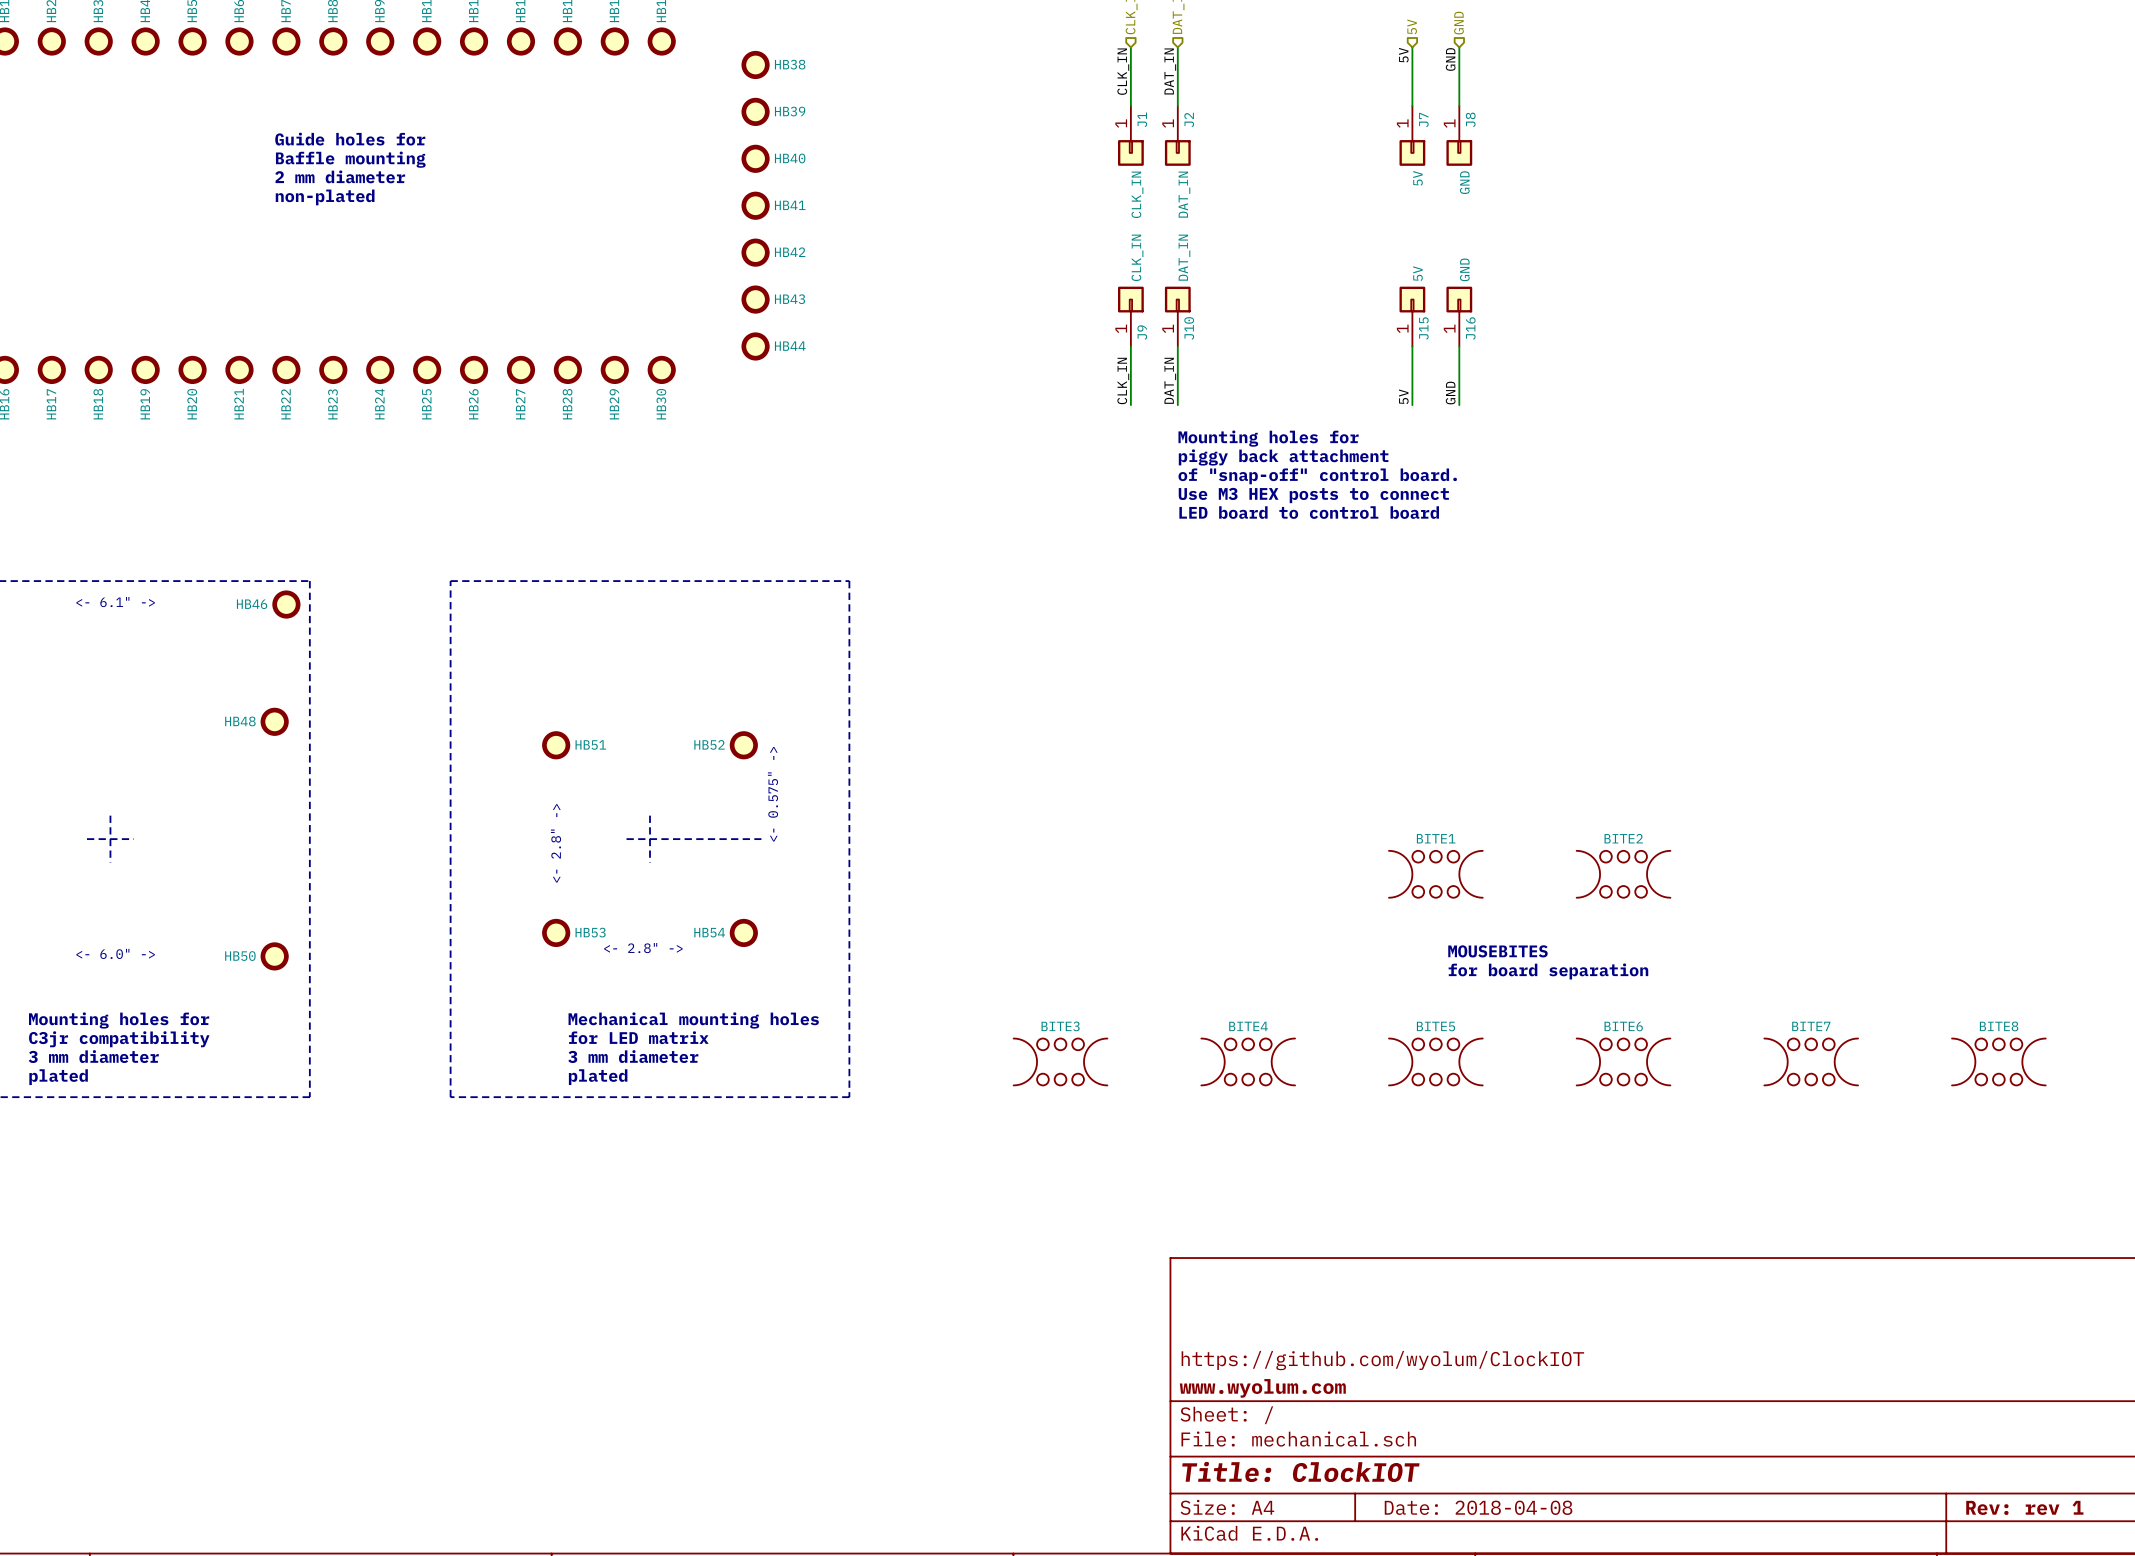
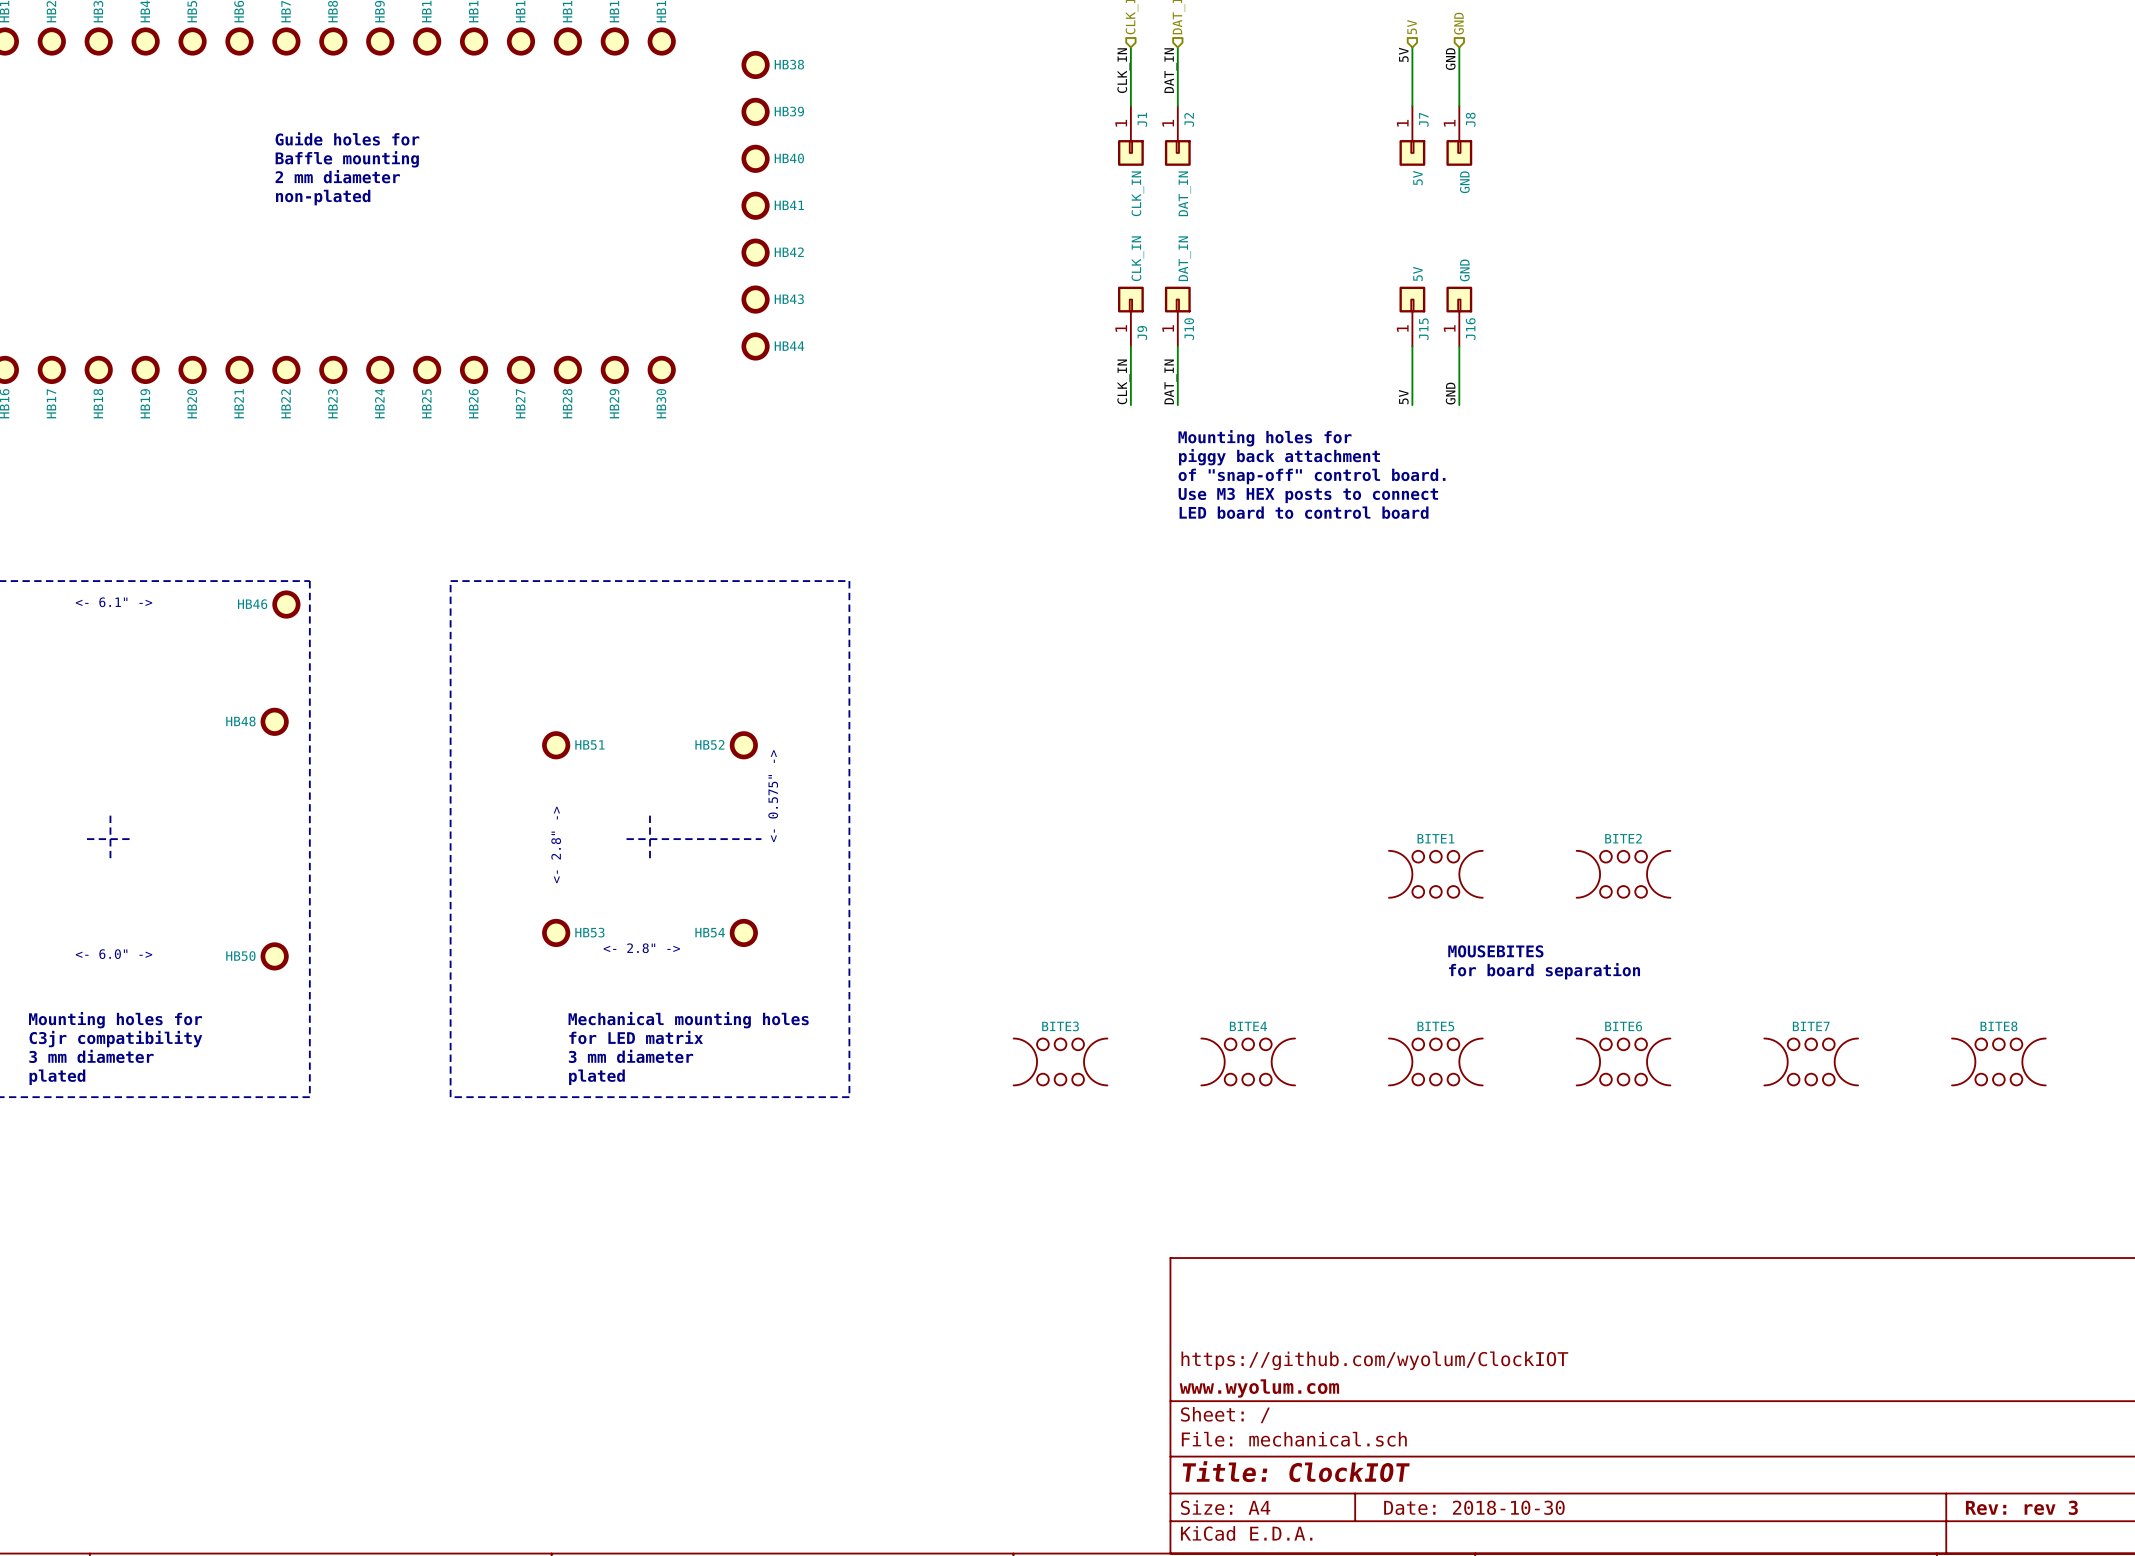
title block: Date: 2018-04-08 (1478, 1507) -> Date: 2018-10-30 (1474, 1507)
title block: Rev: rev 1 (2024, 1507) -> Rev: rev 3 (2021, 1507)

